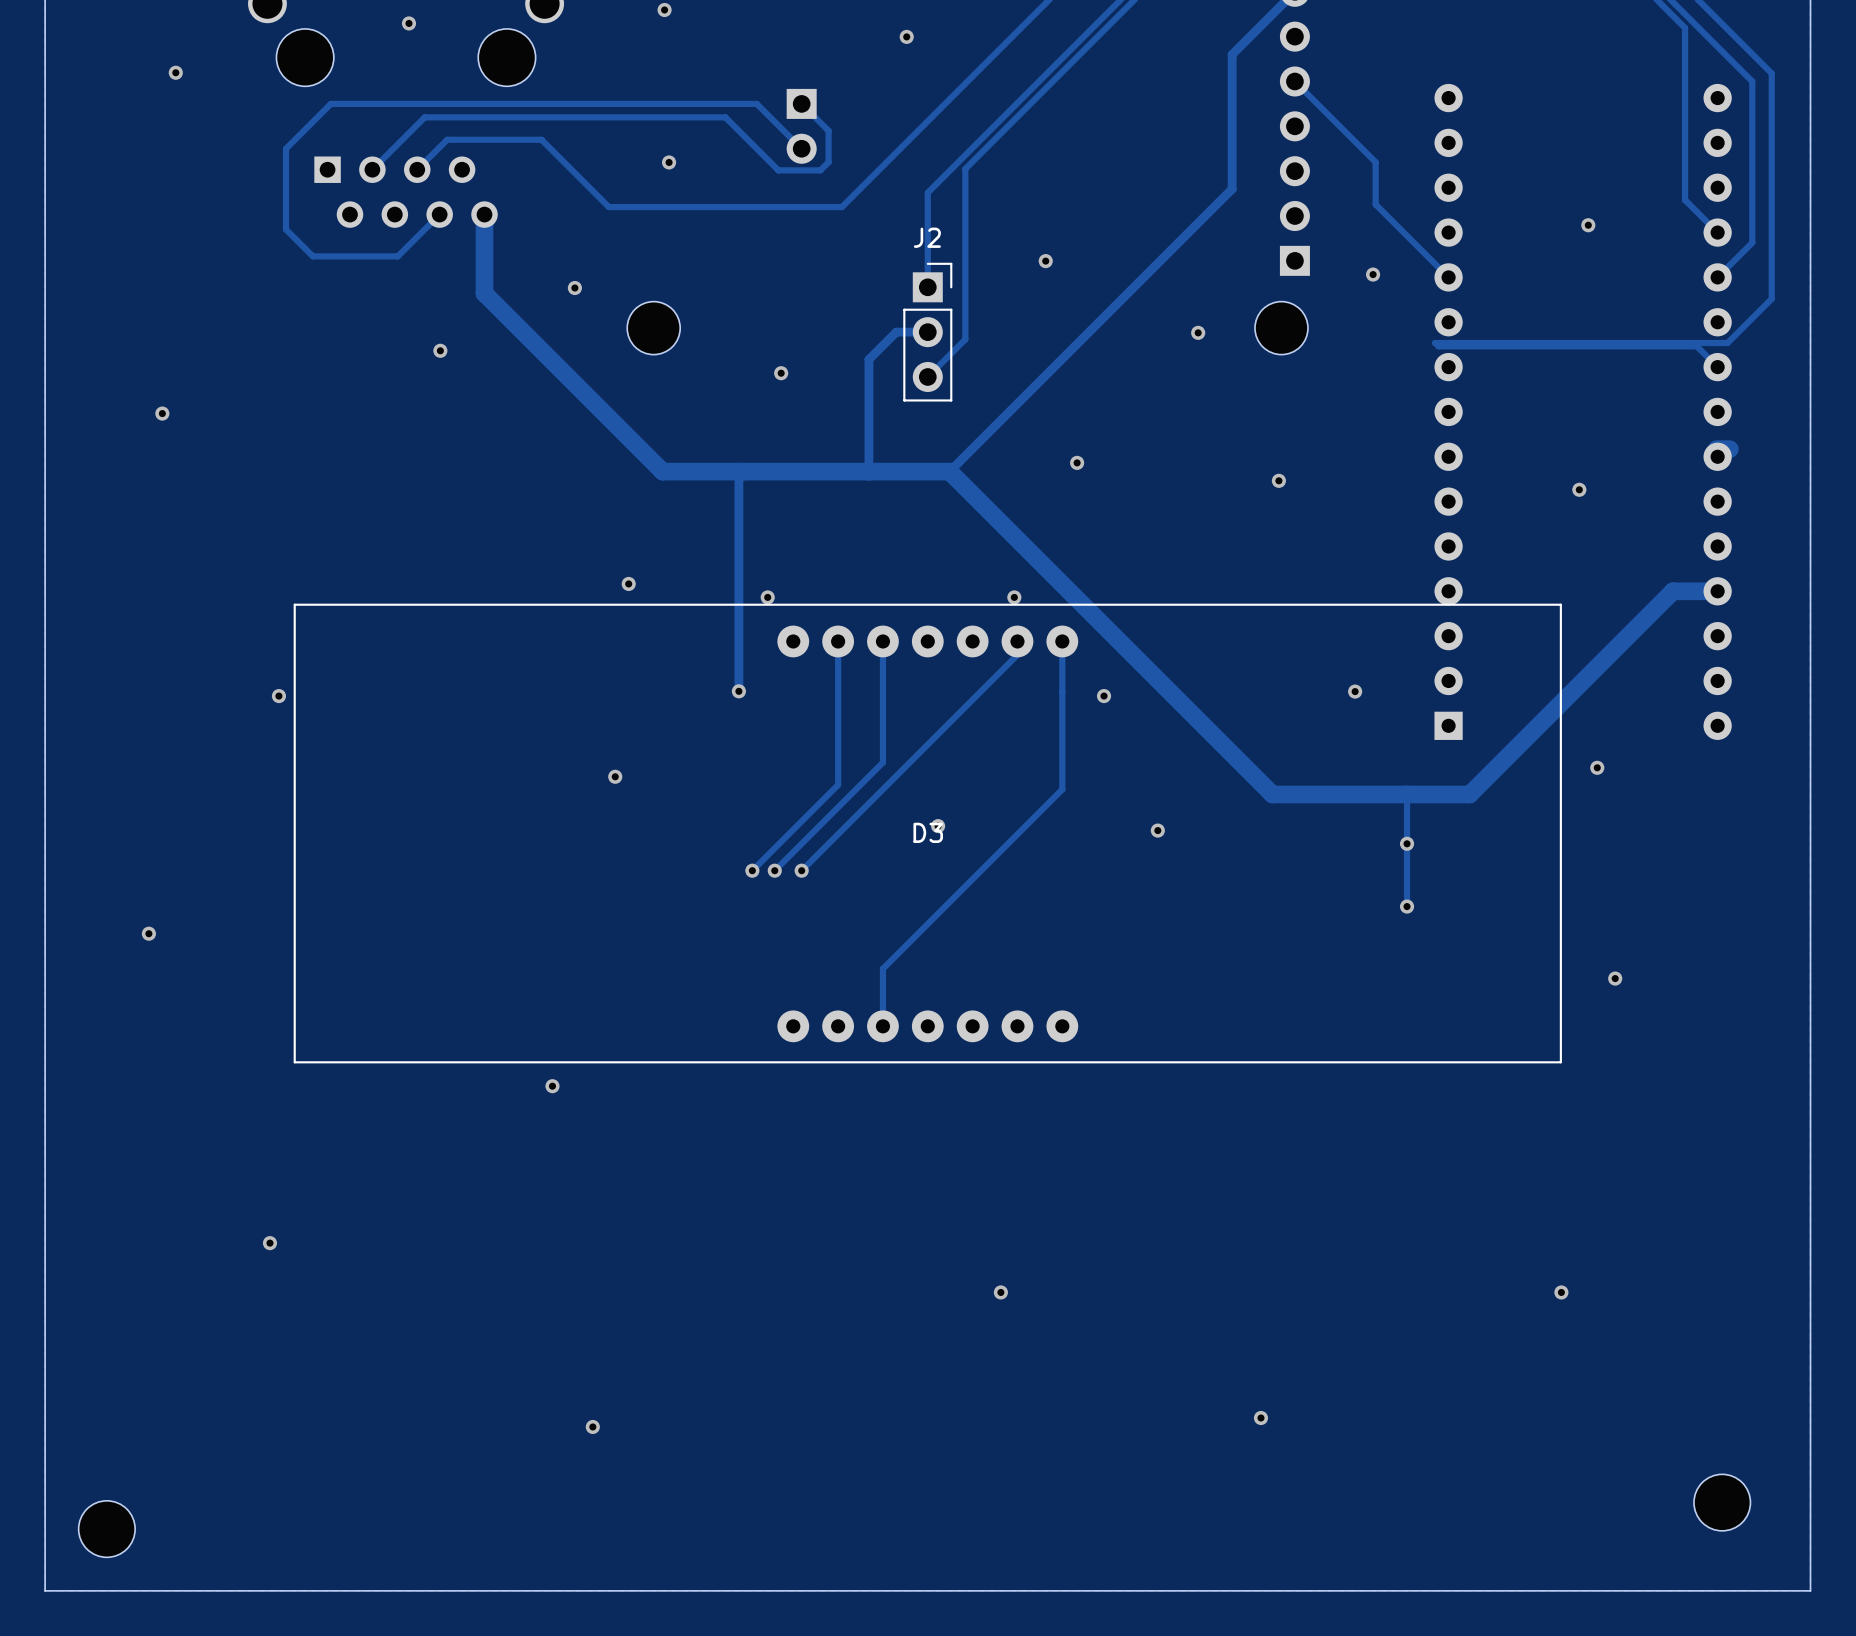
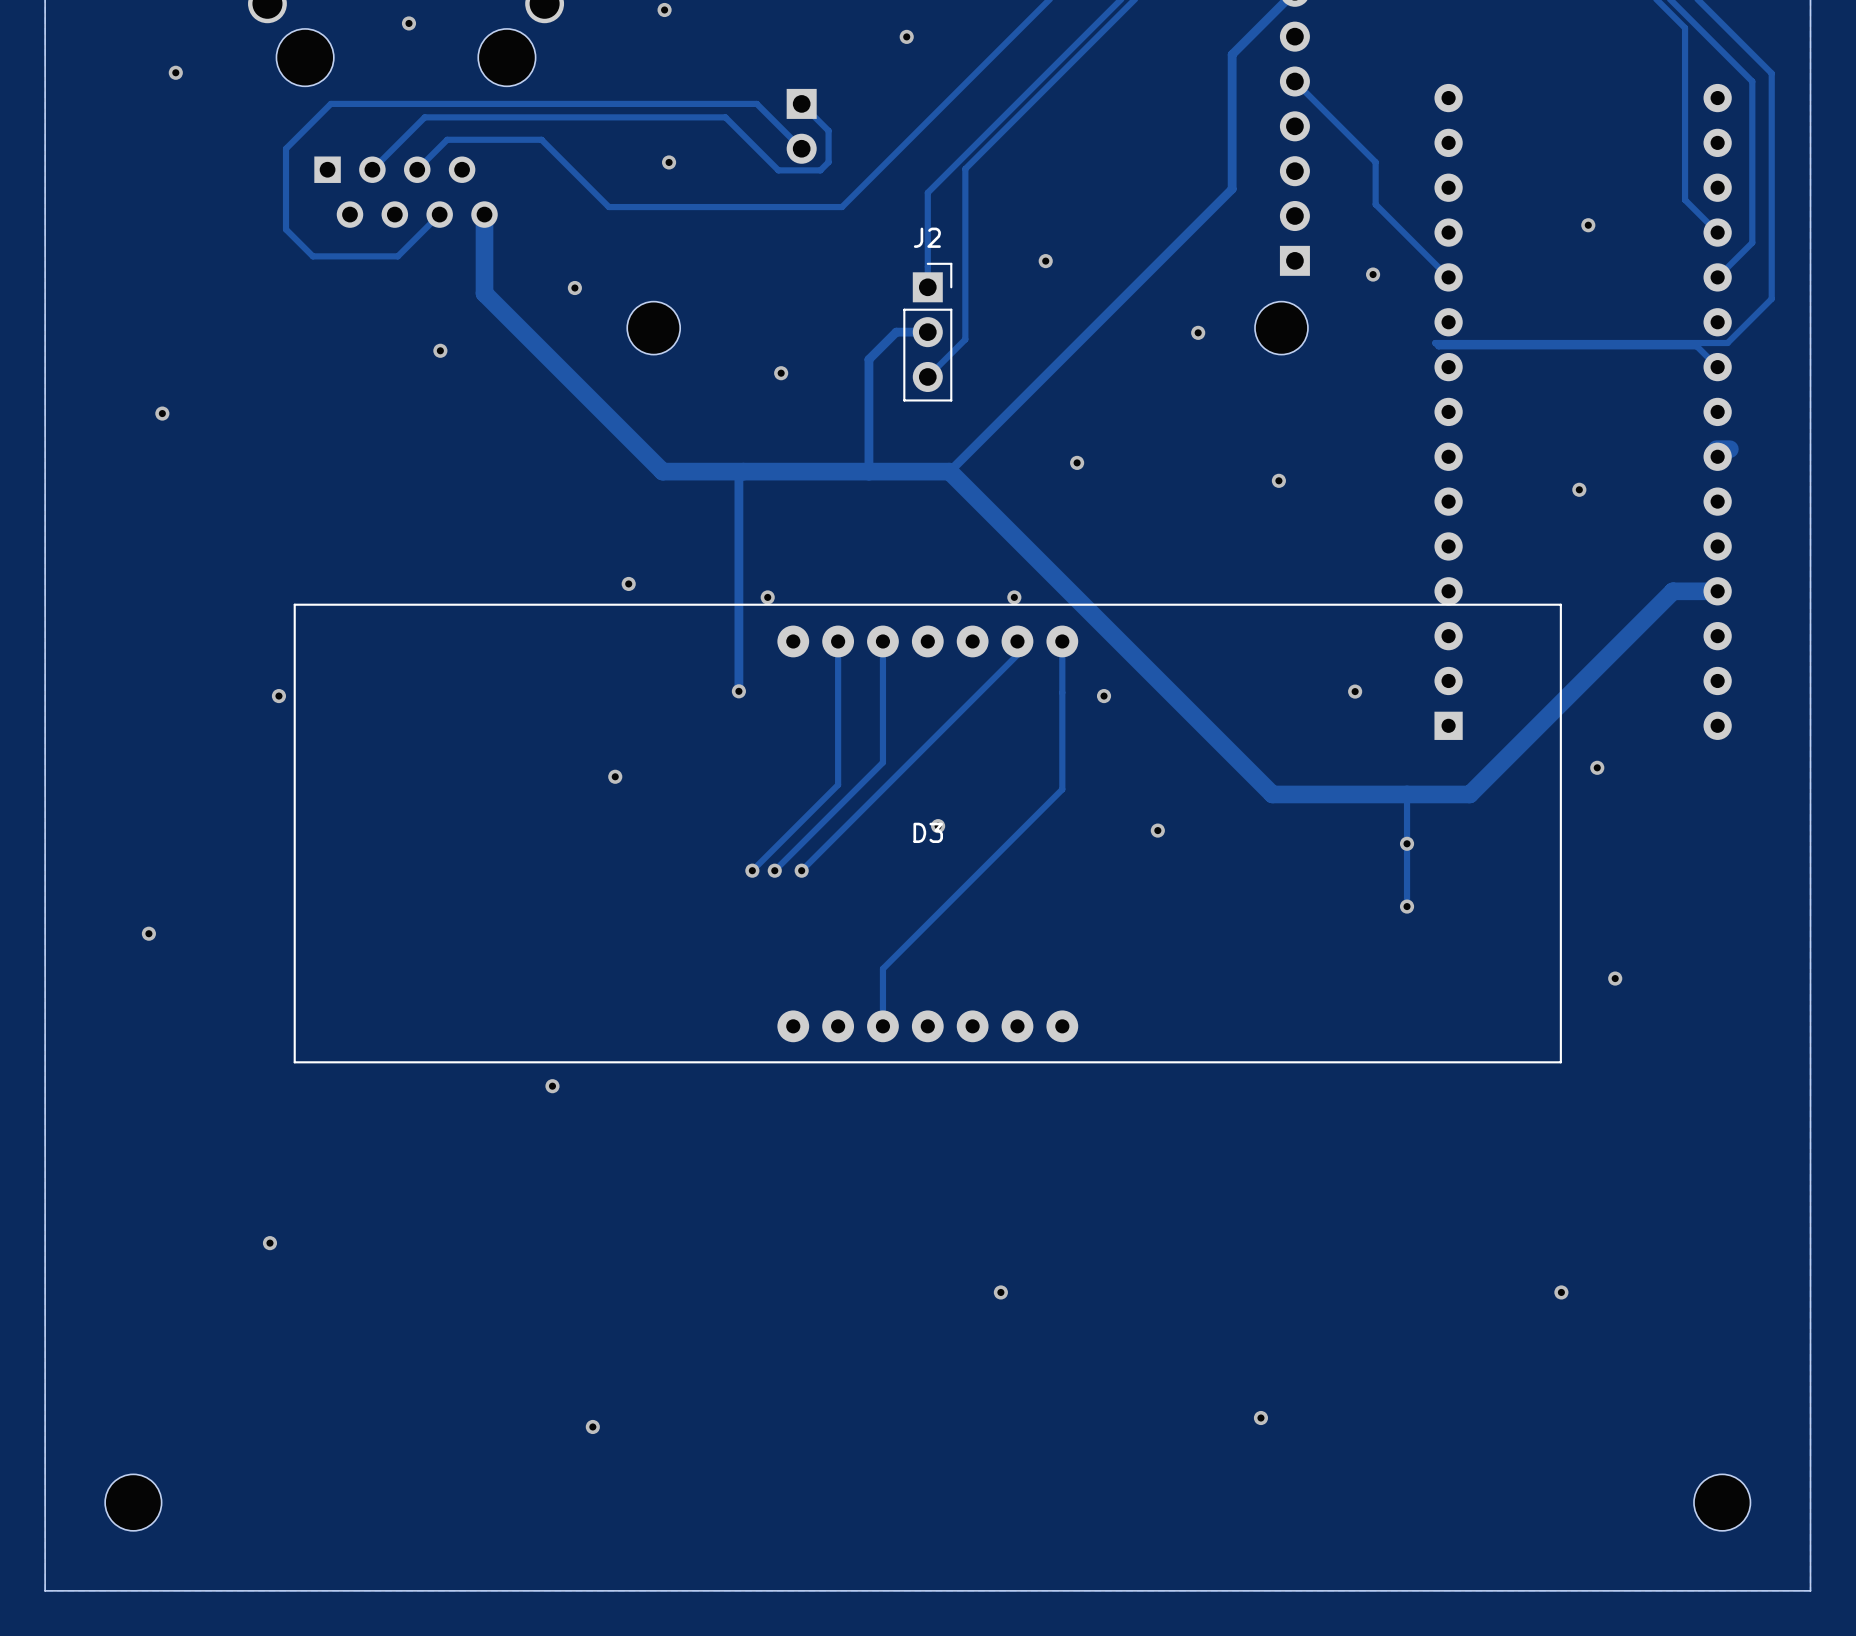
part position: (106, 1529) -> (133, 1502)

